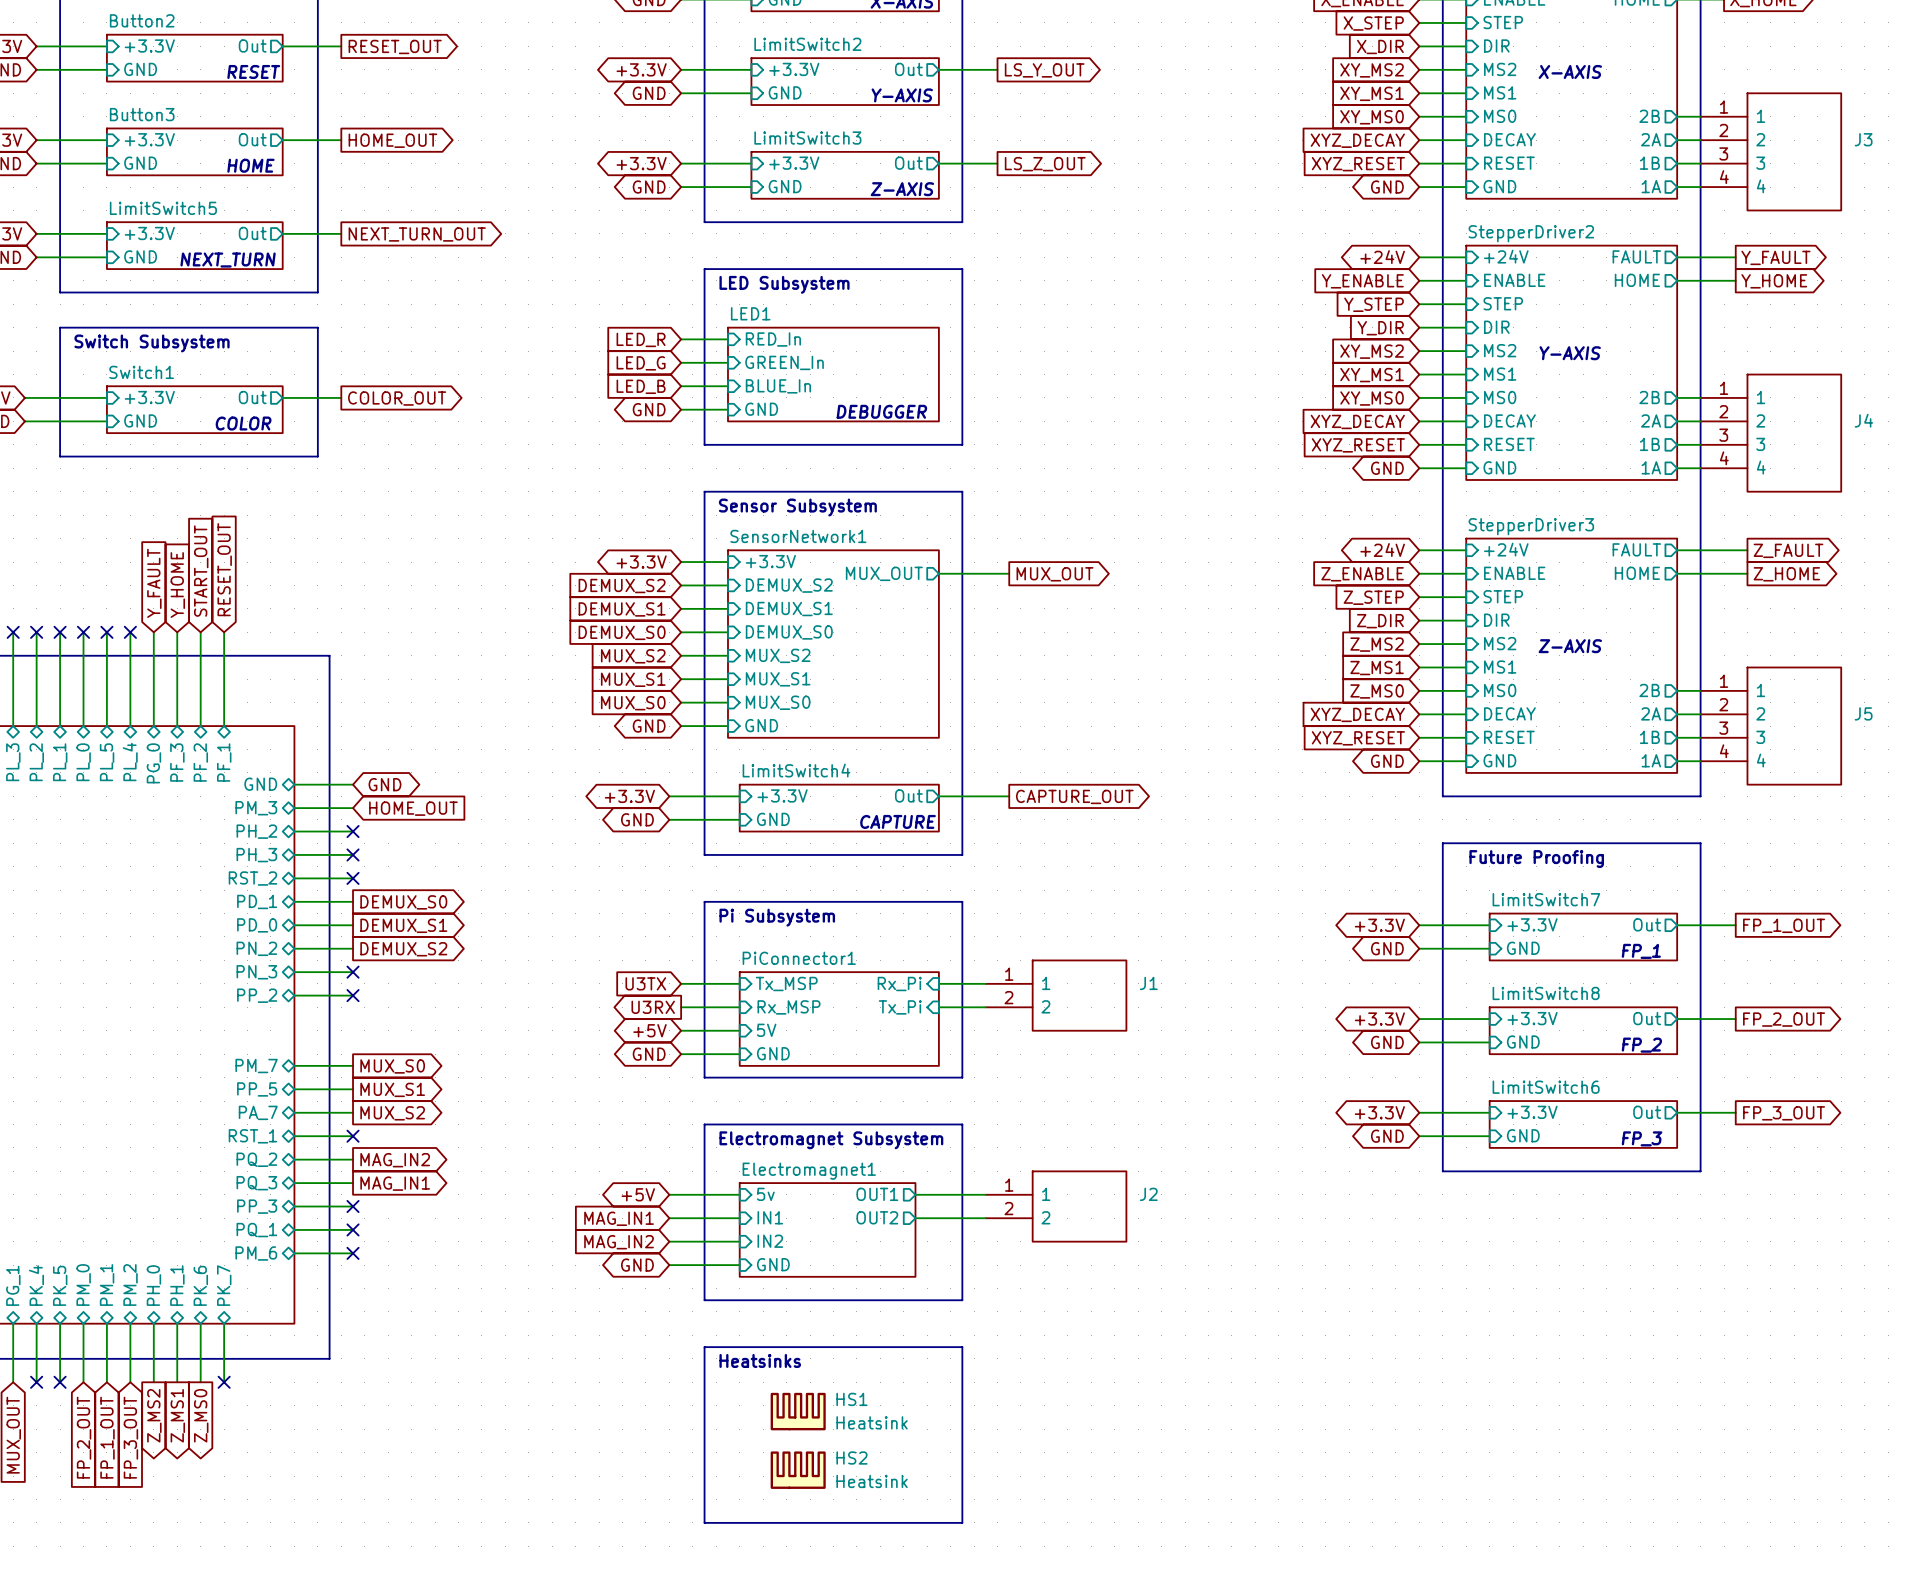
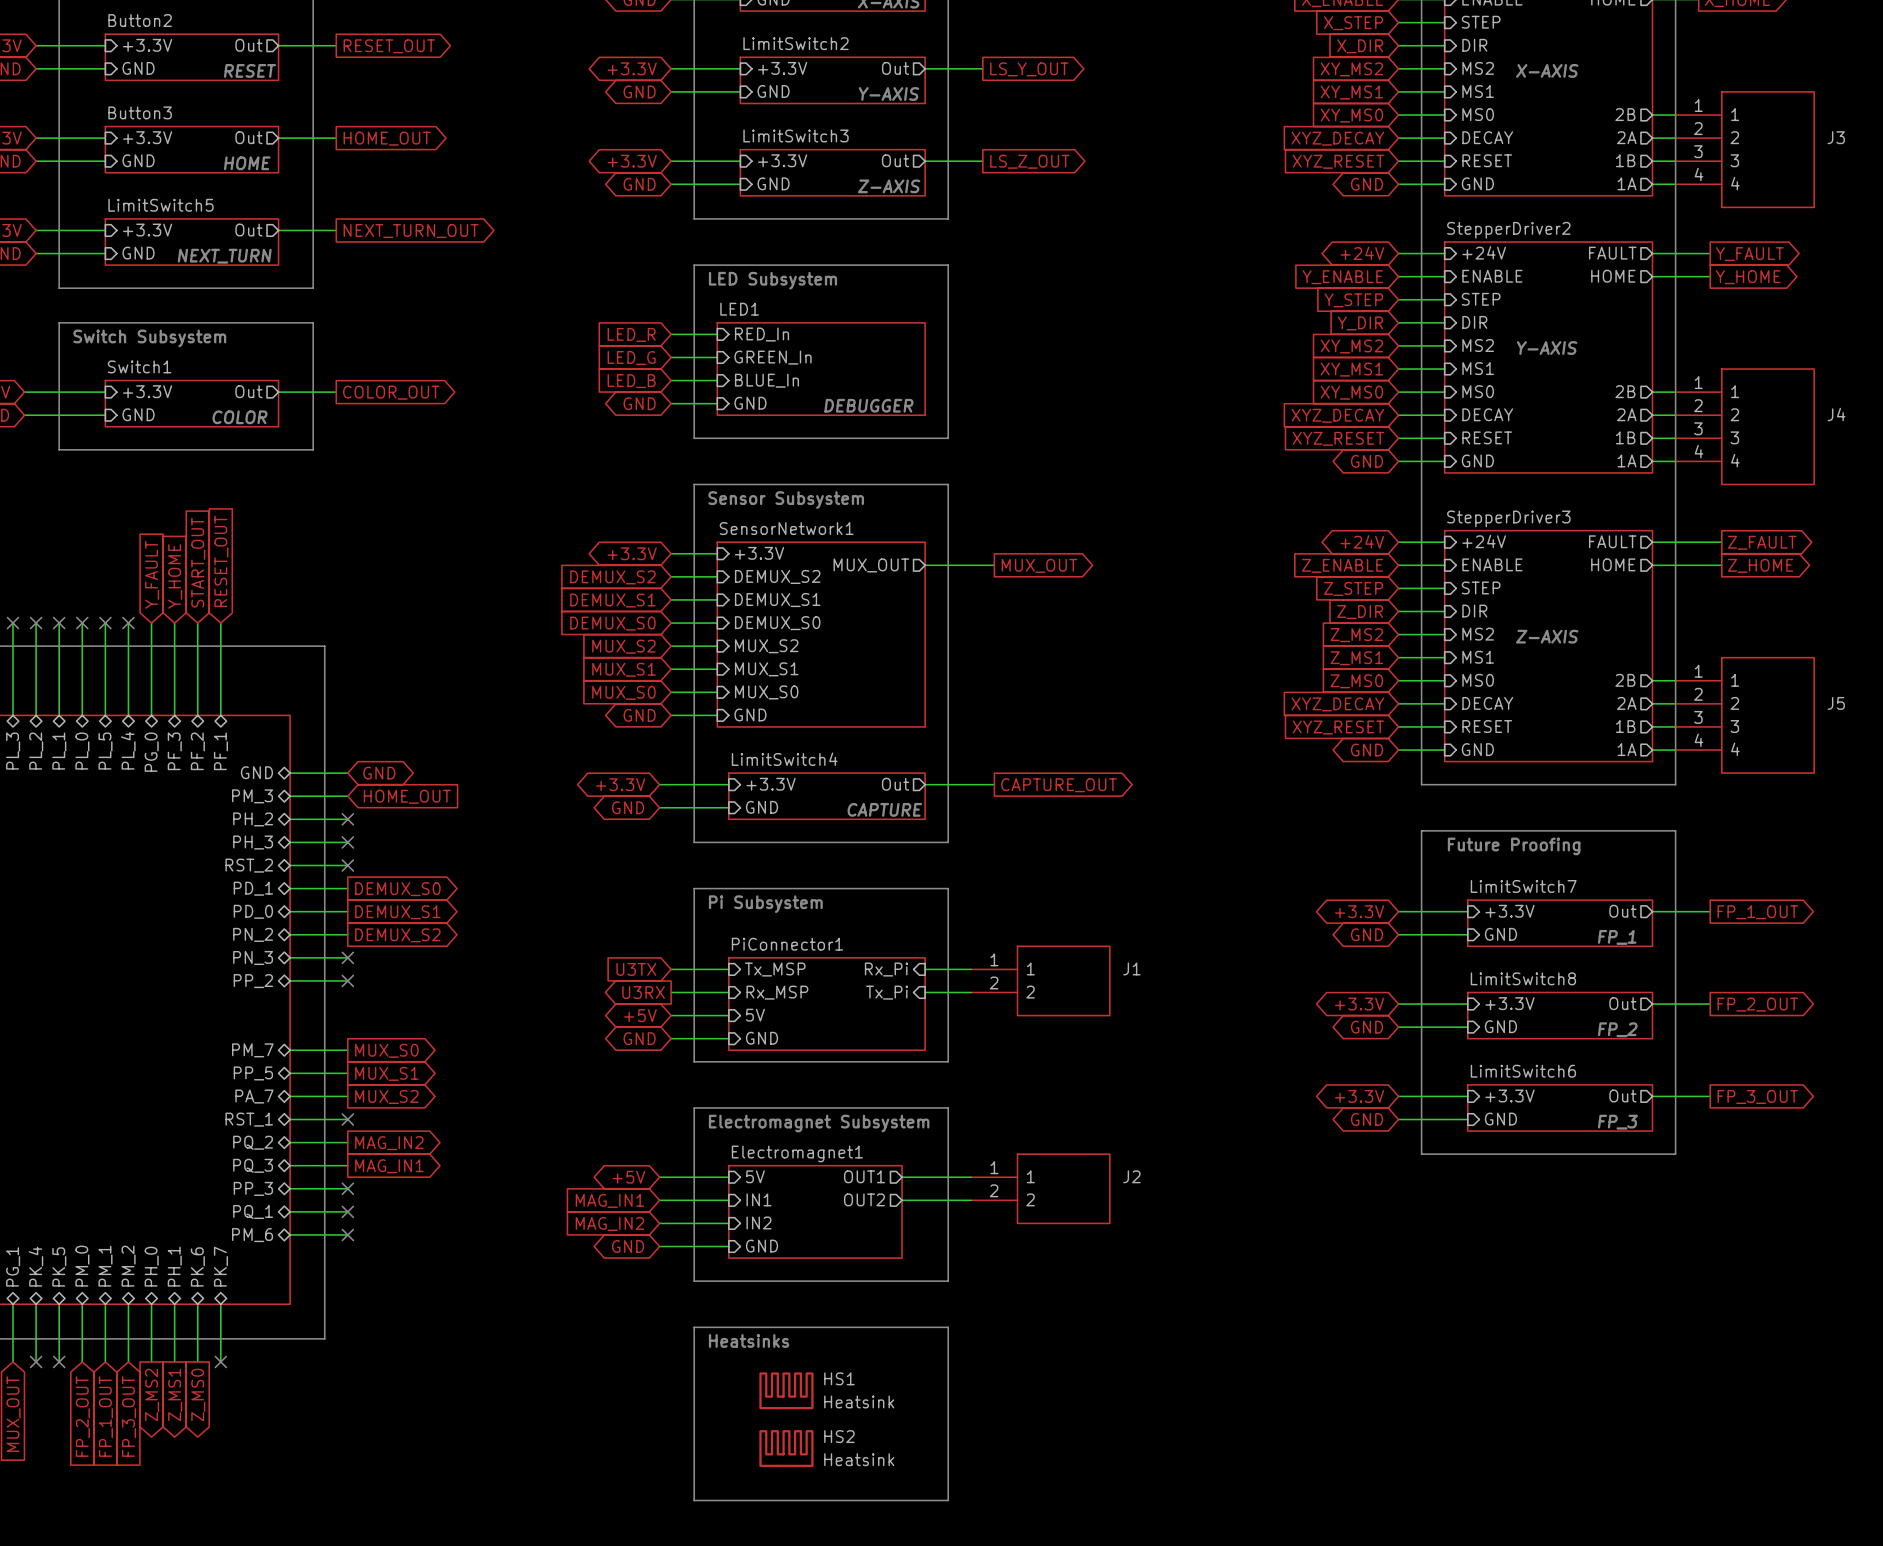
sheet pin: 5v (765, 1194) -> 5V (755, 1176)

